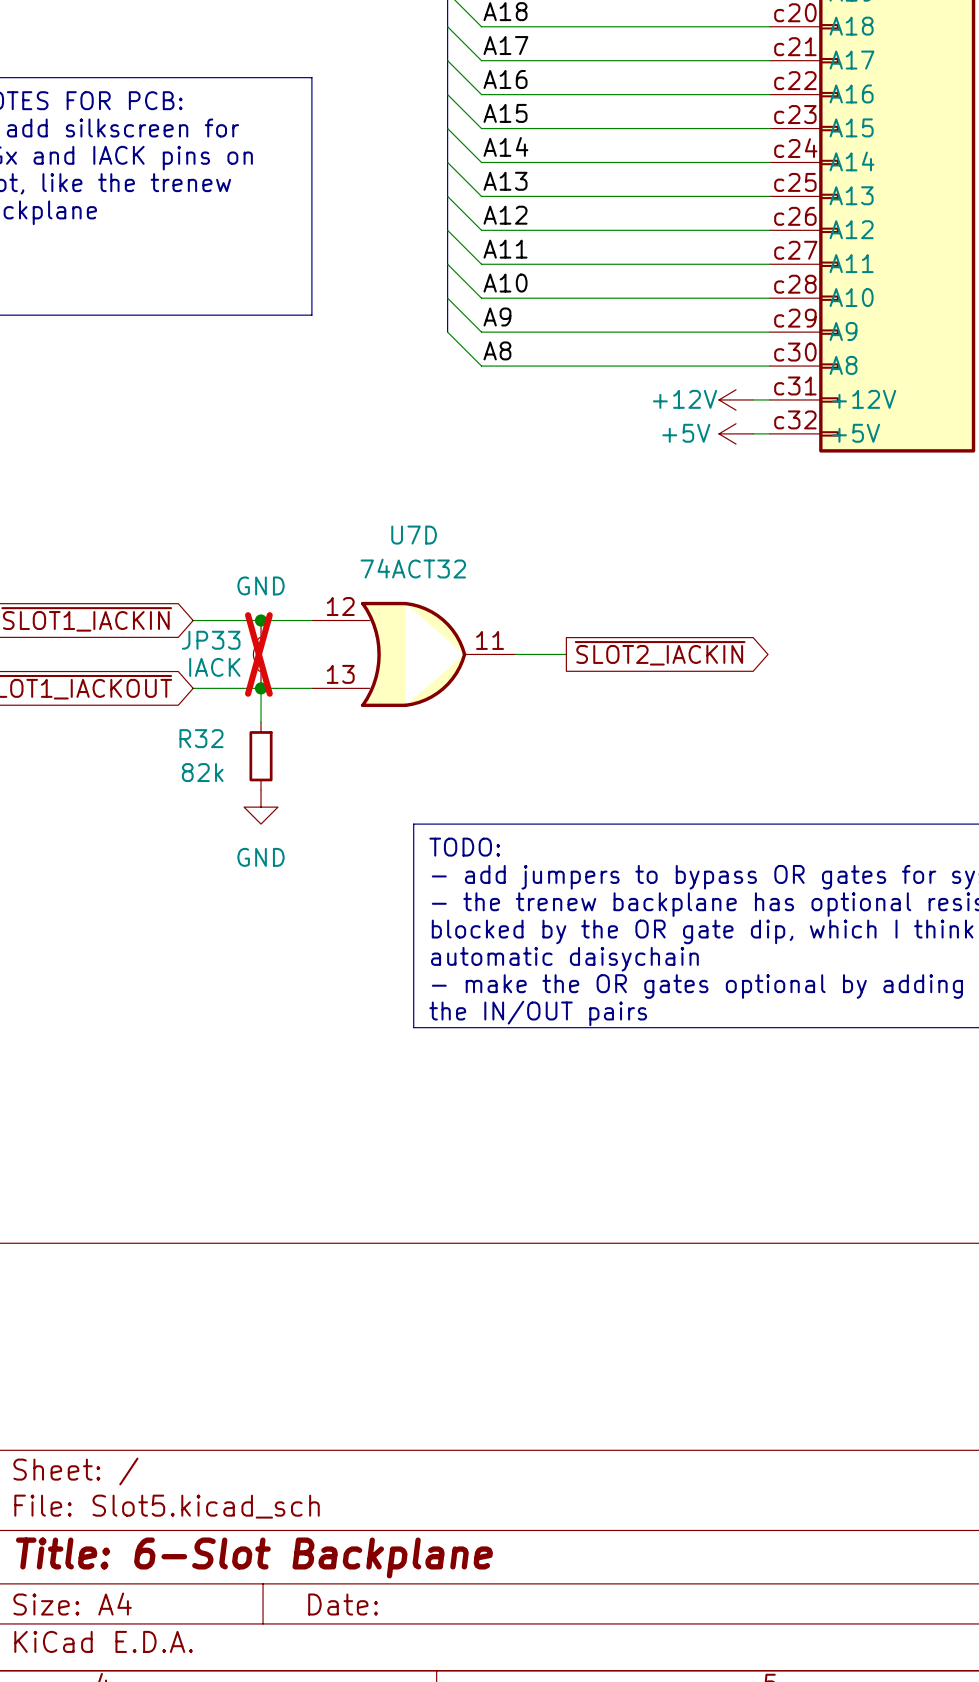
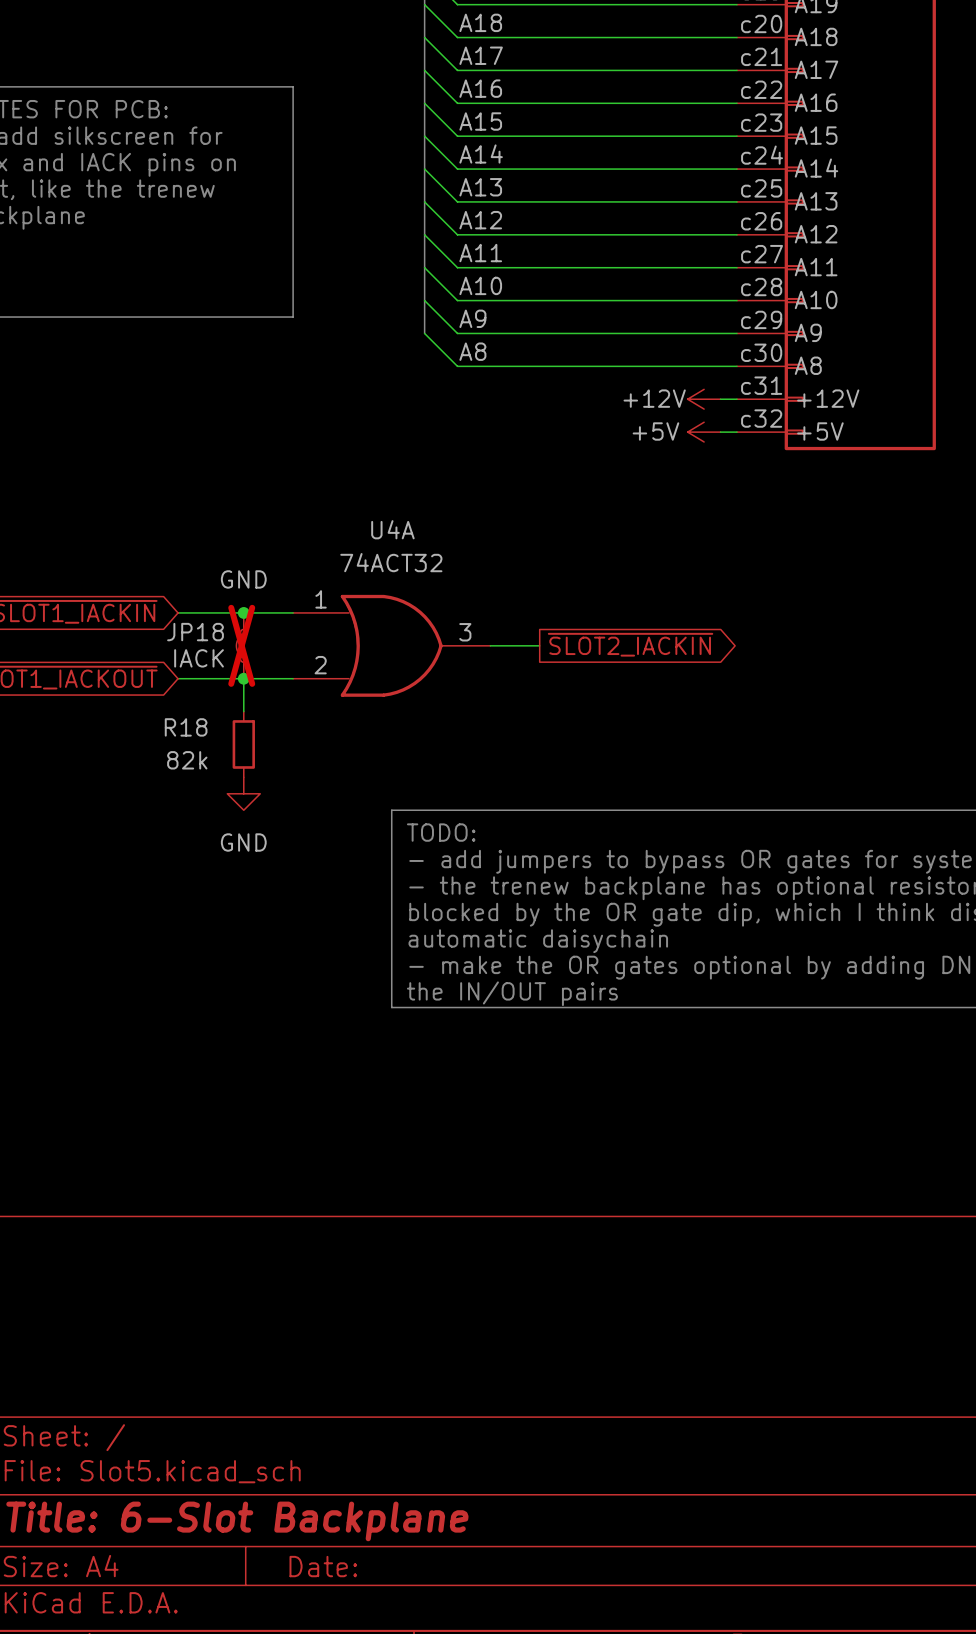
U7D name: U7D (414, 535) -> U4A (392, 529)
U7D pin number: 12 (340, 606) -> 1 (321, 599)
JP33 name: JP33 (211, 640) -> JP18 (195, 632)
U7D pin number: 11 (490, 640) -> 3 (465, 632)
U7D pin number: 13 (340, 674) -> 2 (320, 665)
R32 name: R32 (201, 738) -> R18 (186, 727)

